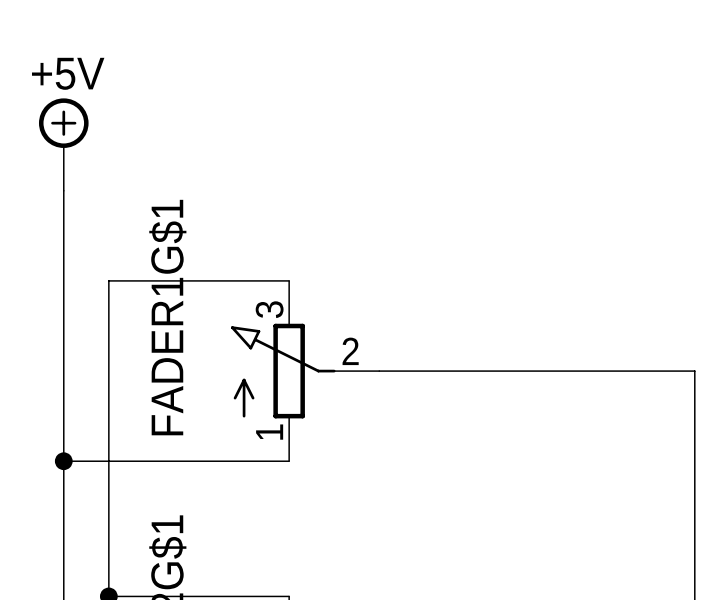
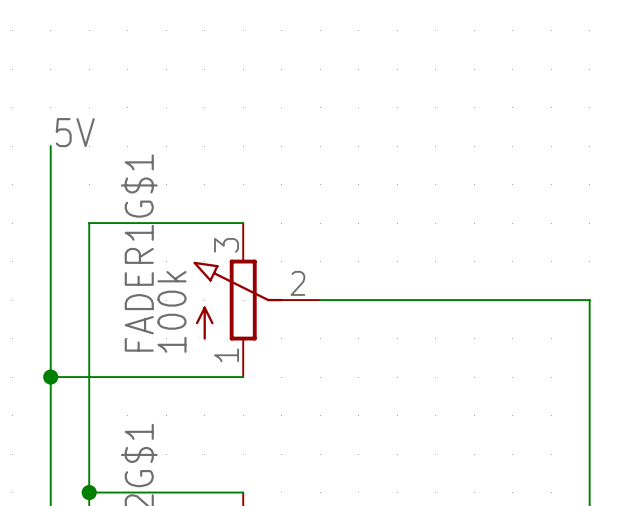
power symbol: +5V (63, 144) -> none
label: none -> 5V (75, 132)
FADER1G$1 value: none -> 100k (171, 311)

